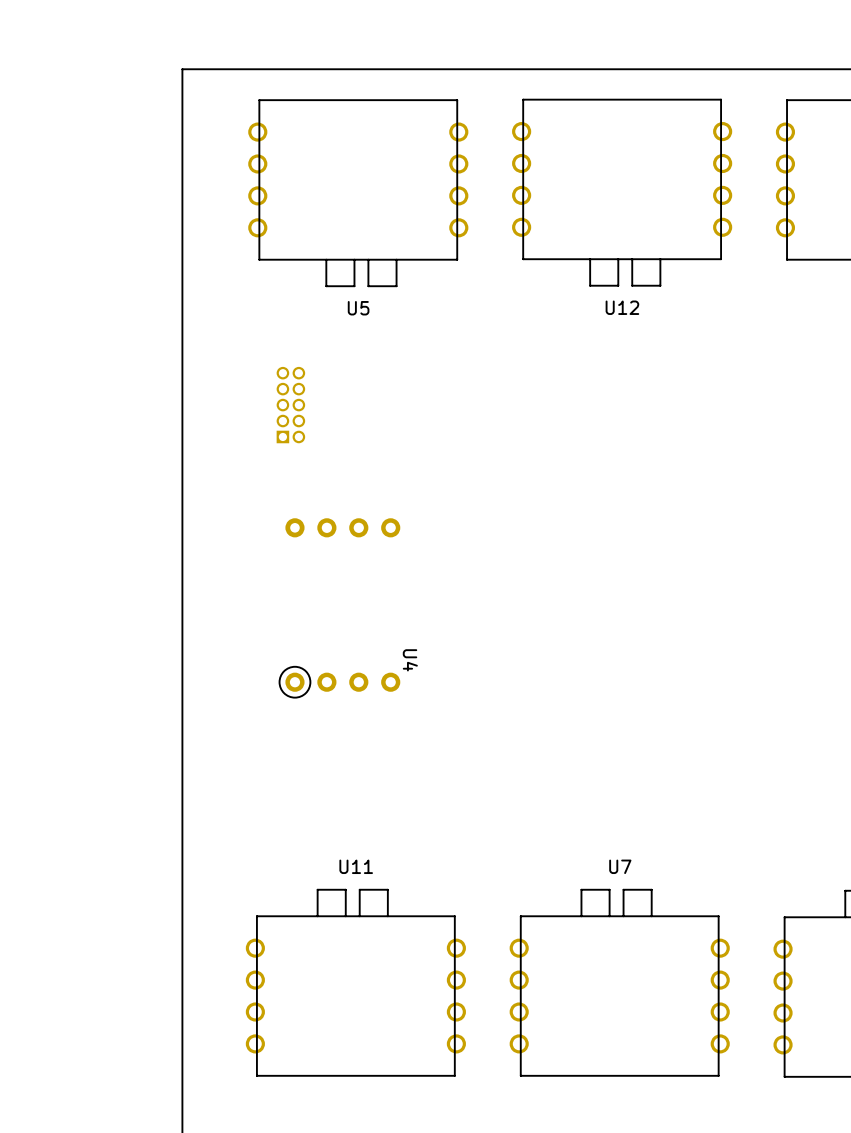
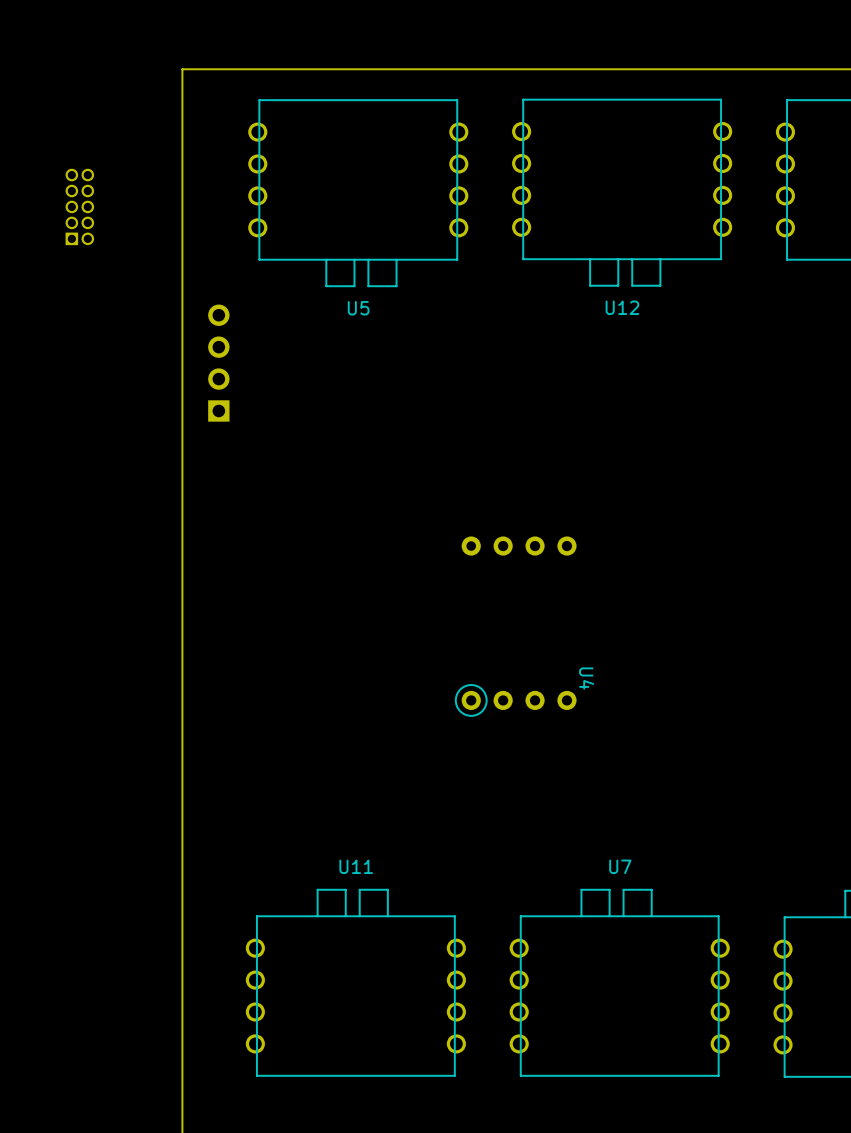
part: none -> (218, 363)
part position: (290, 405) -> (79, 206)
U4 position: (339, 608) -> (515, 626)

